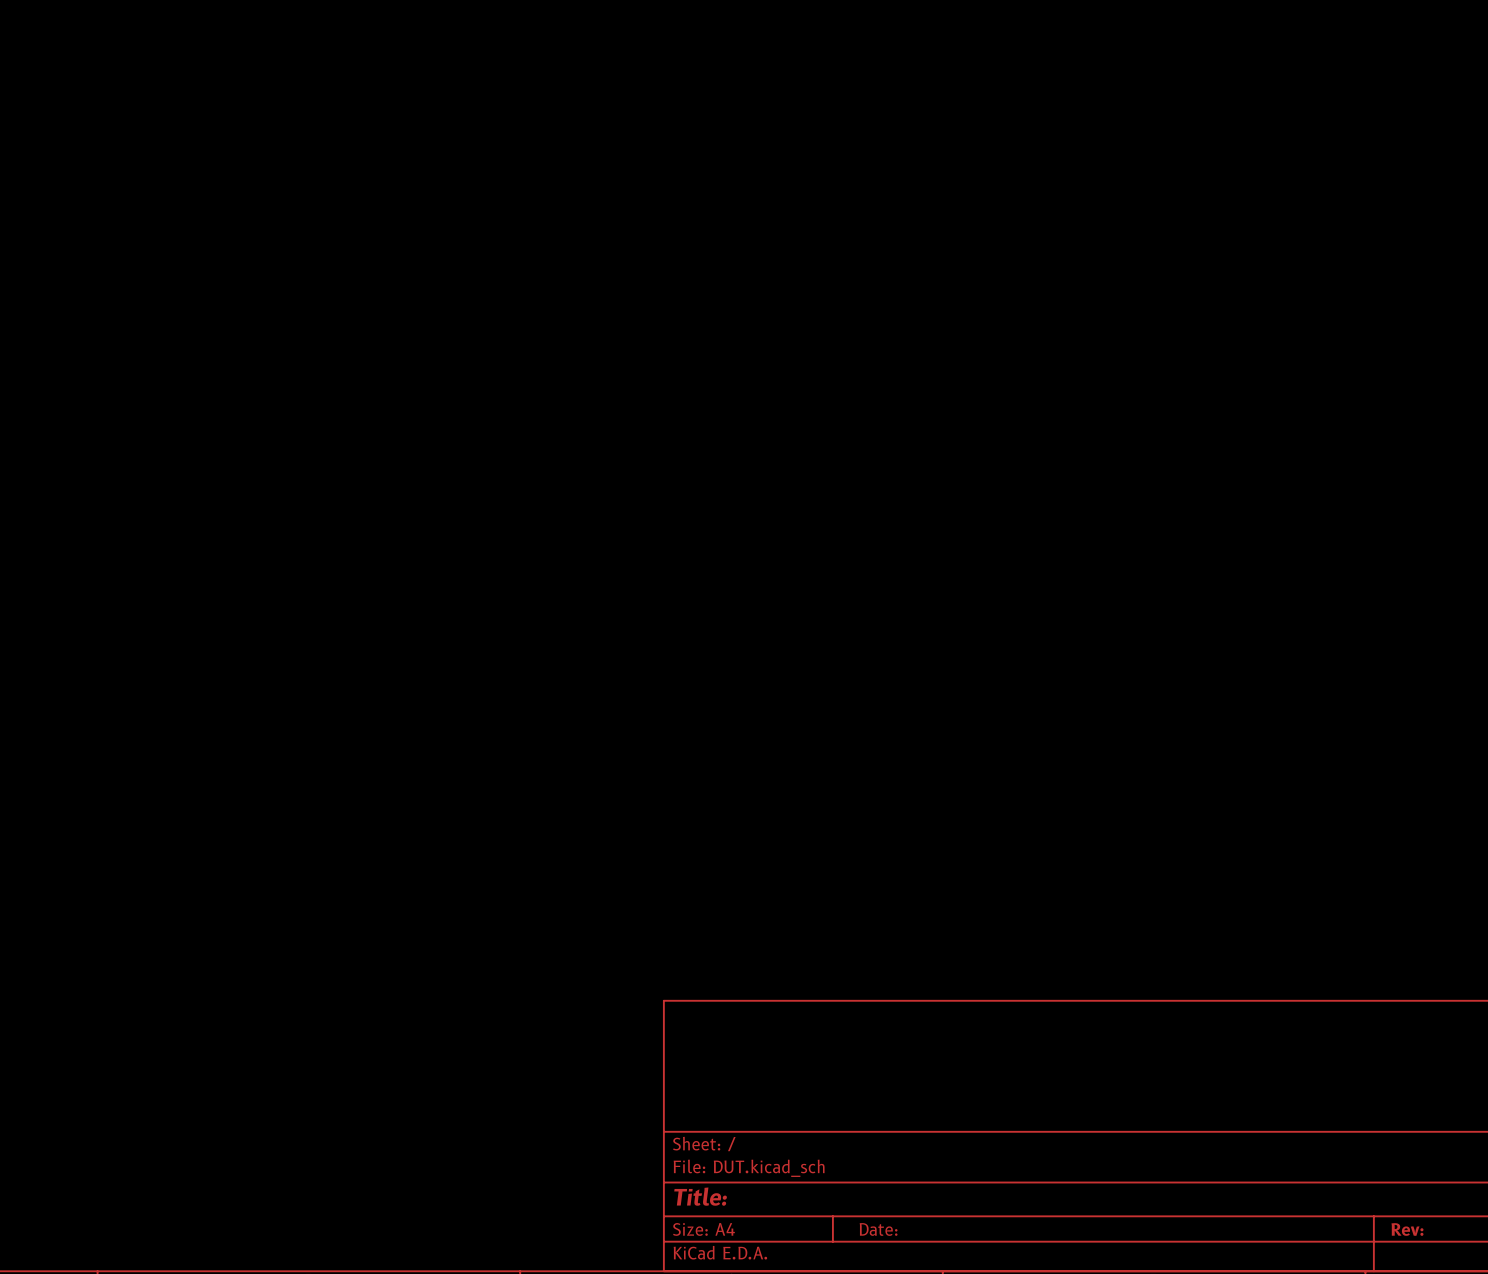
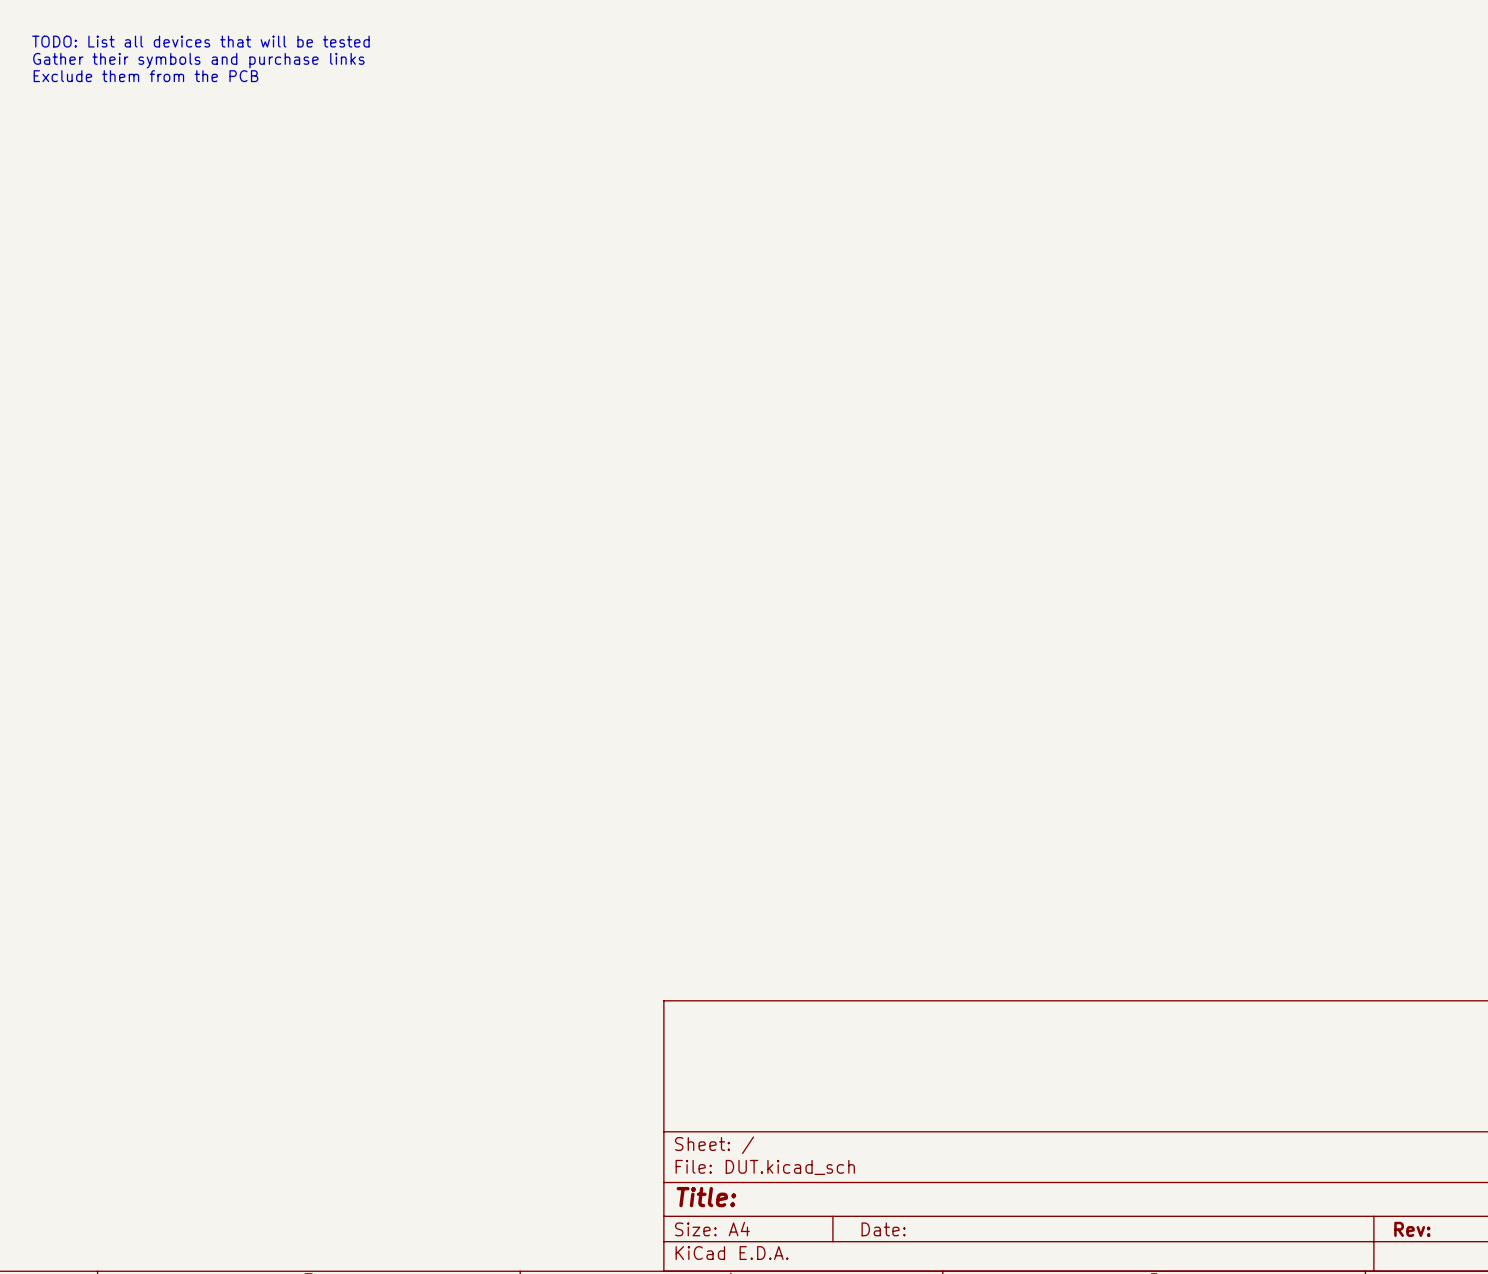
text: none -> TODO: List all devices that will be tested (200, 41)
text: none -> Gather their symbols and purchase links (198, 60)
text: none -> Exclude them from the PCB (145, 76)

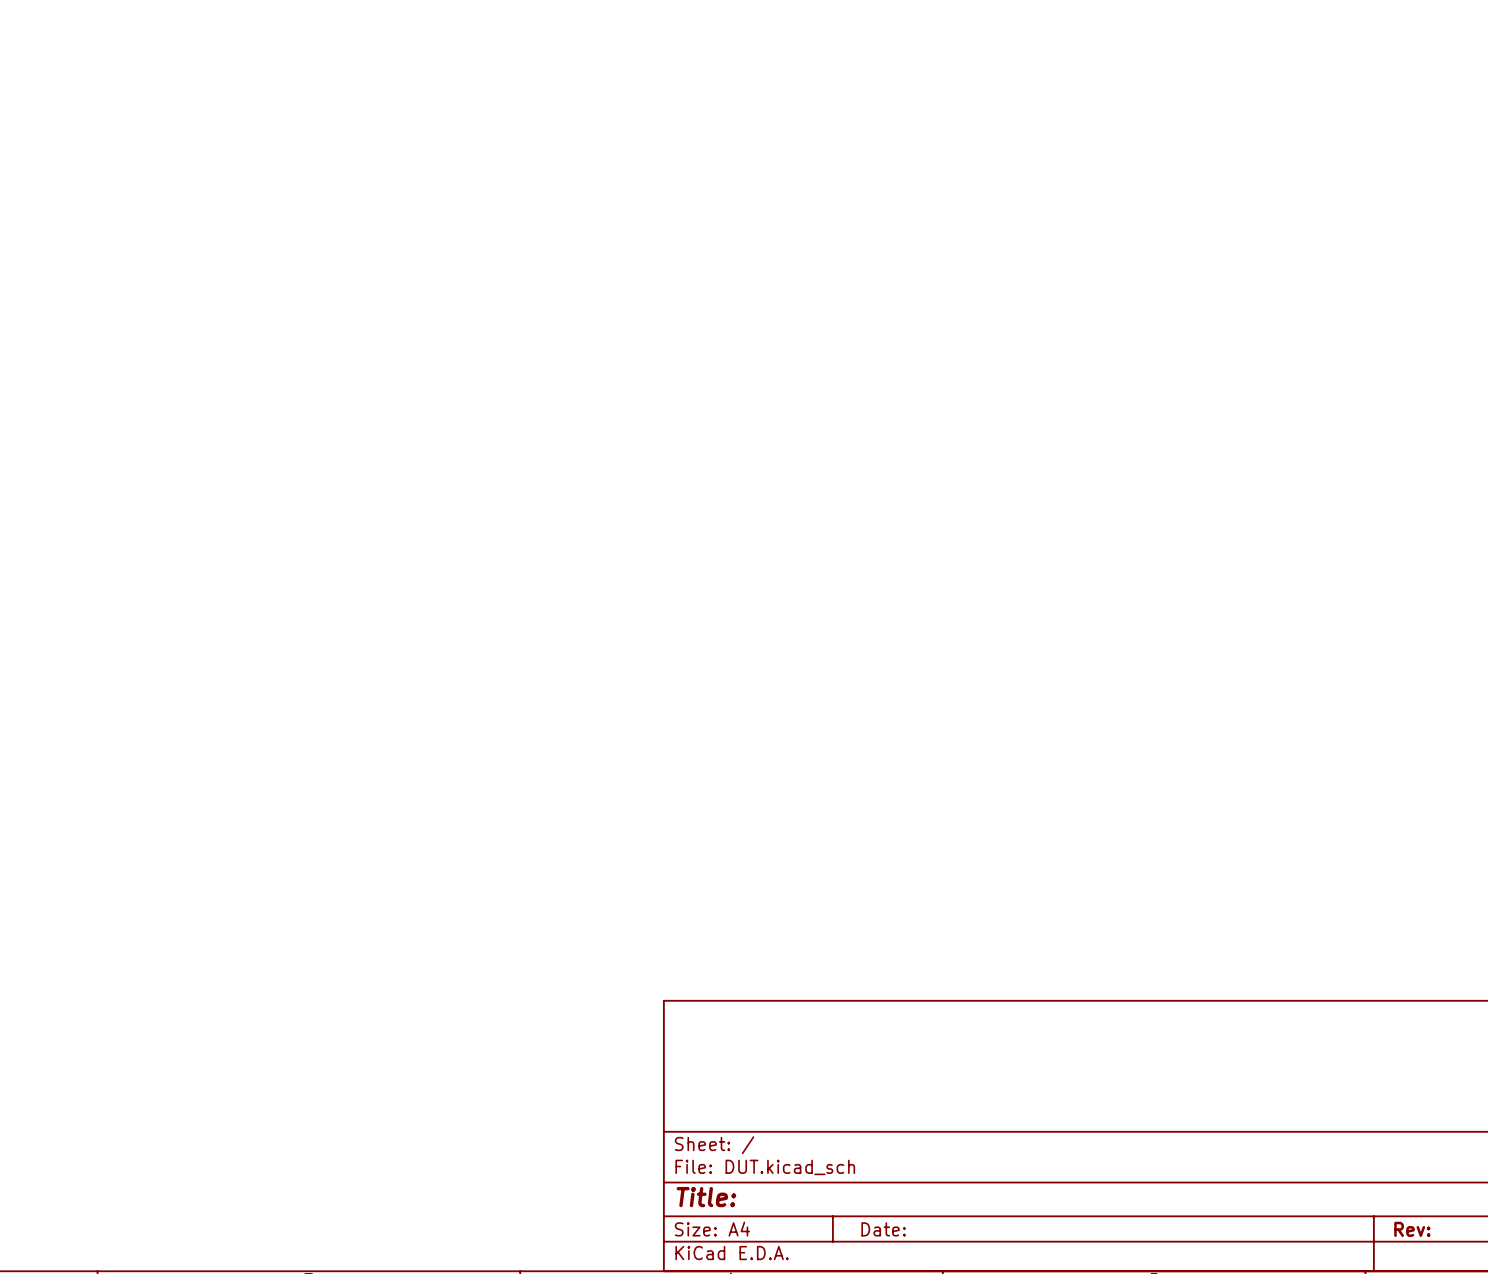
text: TODO: List all devices that will be tested (200, 41) -> none
text: Gather their symbols and purchase links (198, 60) -> none
text: Exclude them from the PCB (145, 76) -> none

